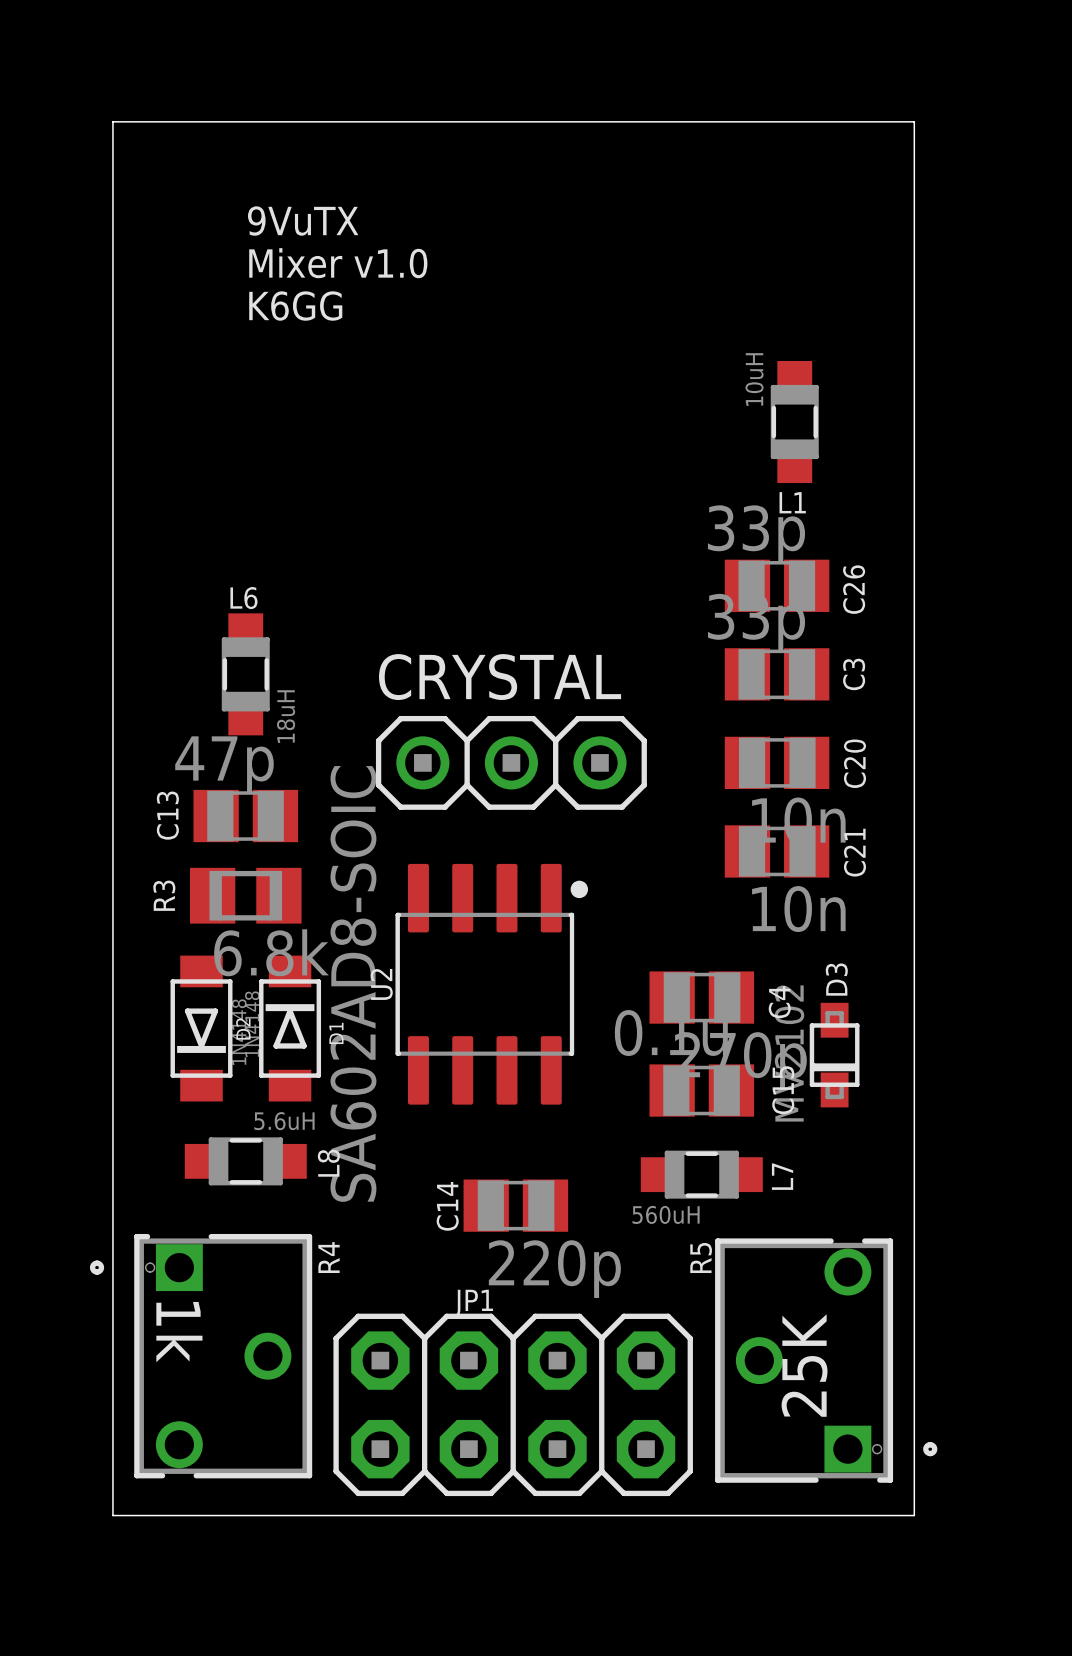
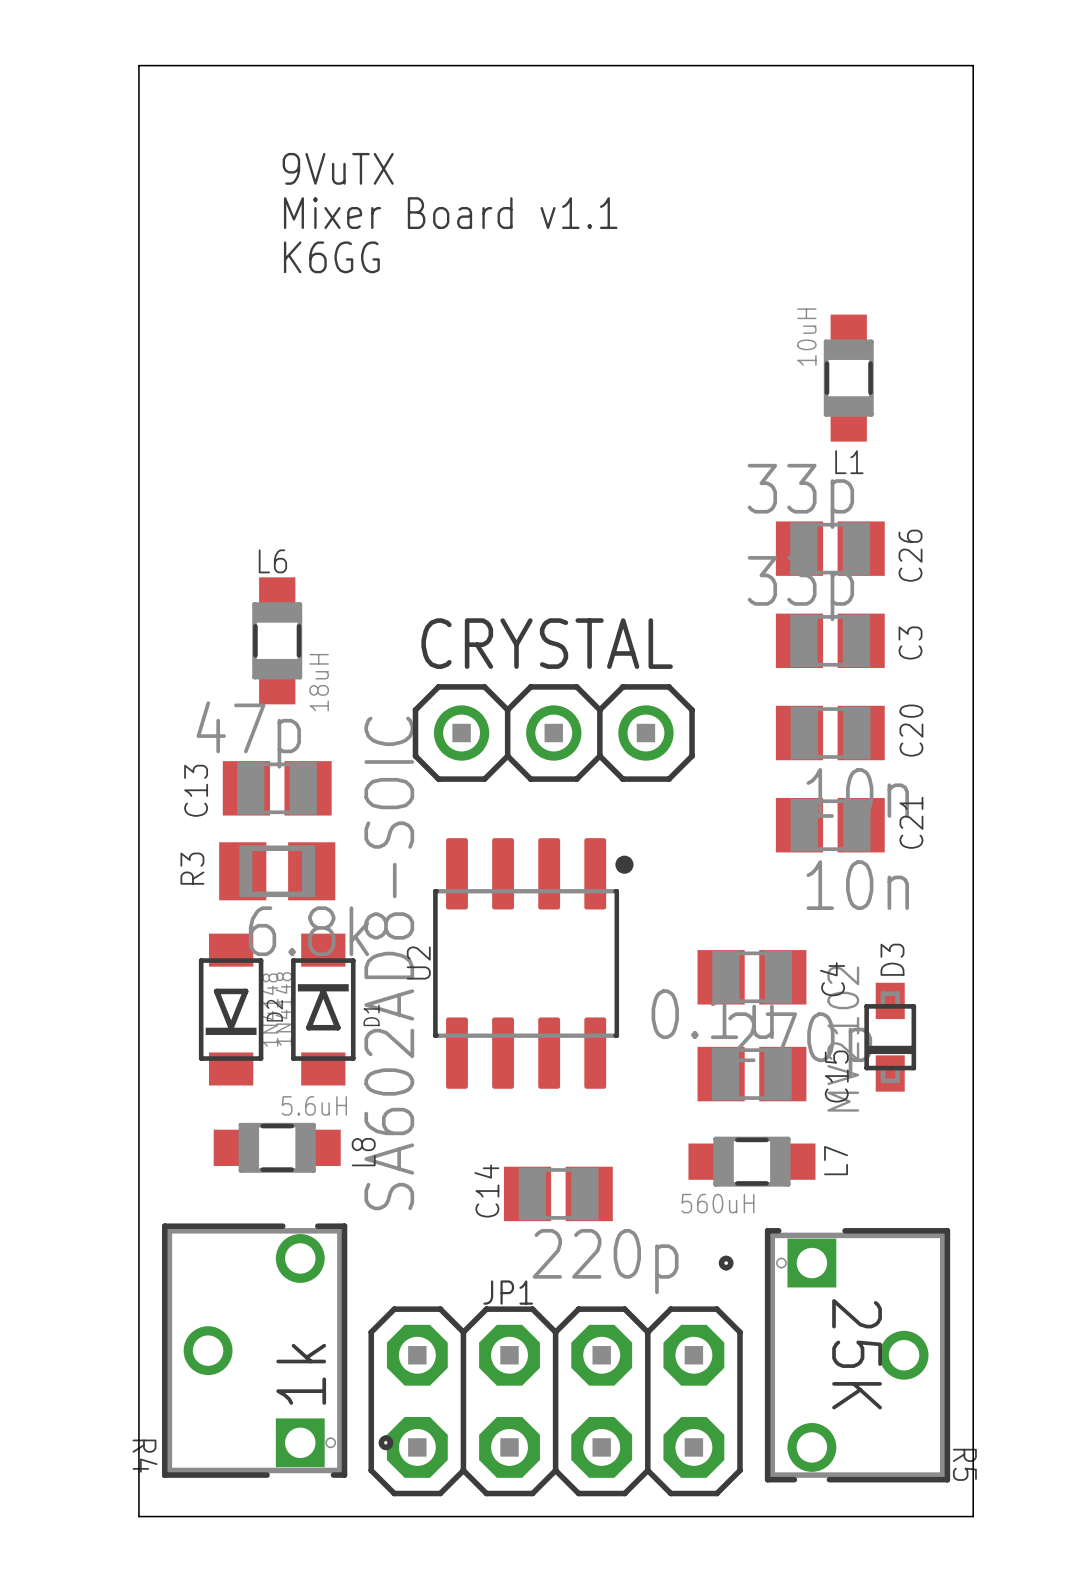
text: Mixer v1.0 (338, 263) -> Mixer Board v1.1 (450, 213)
R4 rotation: 0° (201, 1356) -> 180° (277, 1350)
R5 rotation: 0° (826, 1360) -> 180° (834, 1355)

